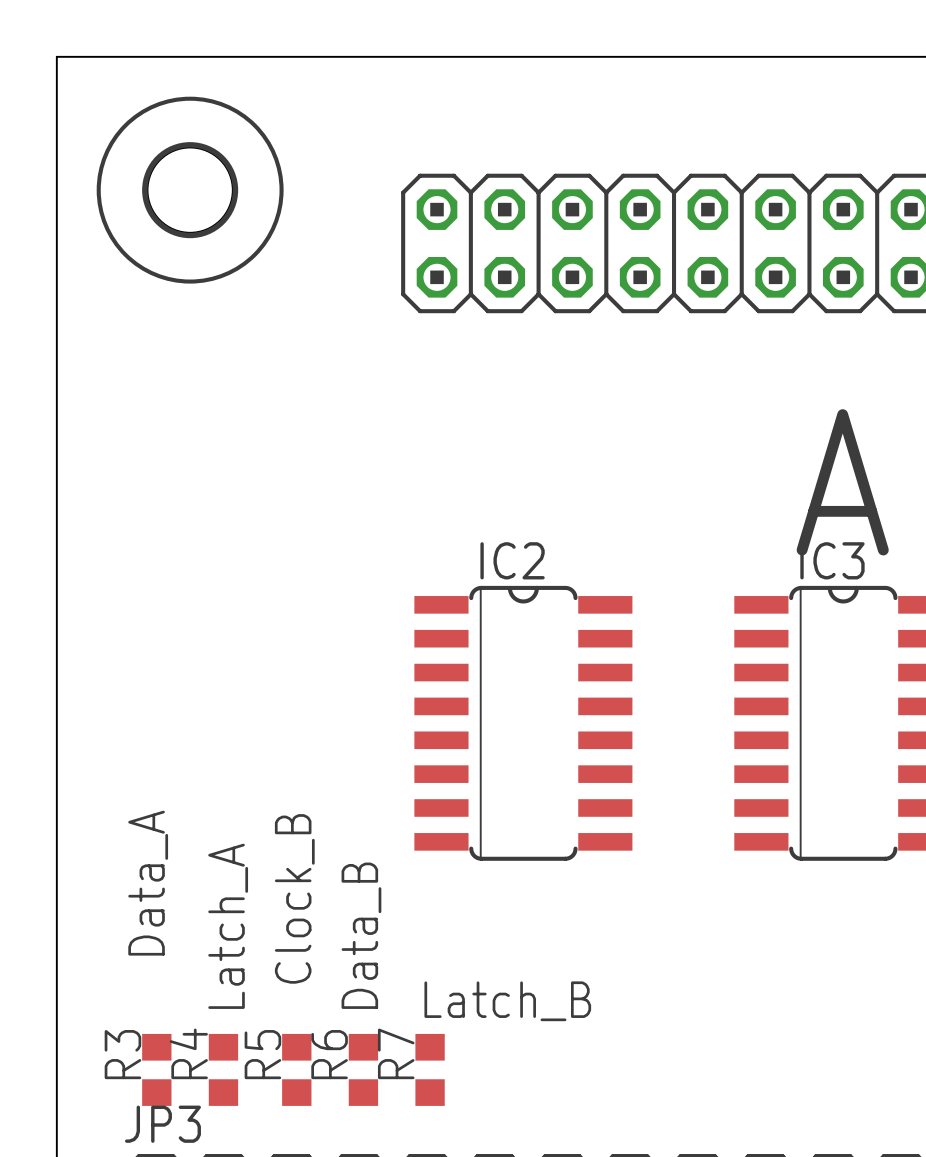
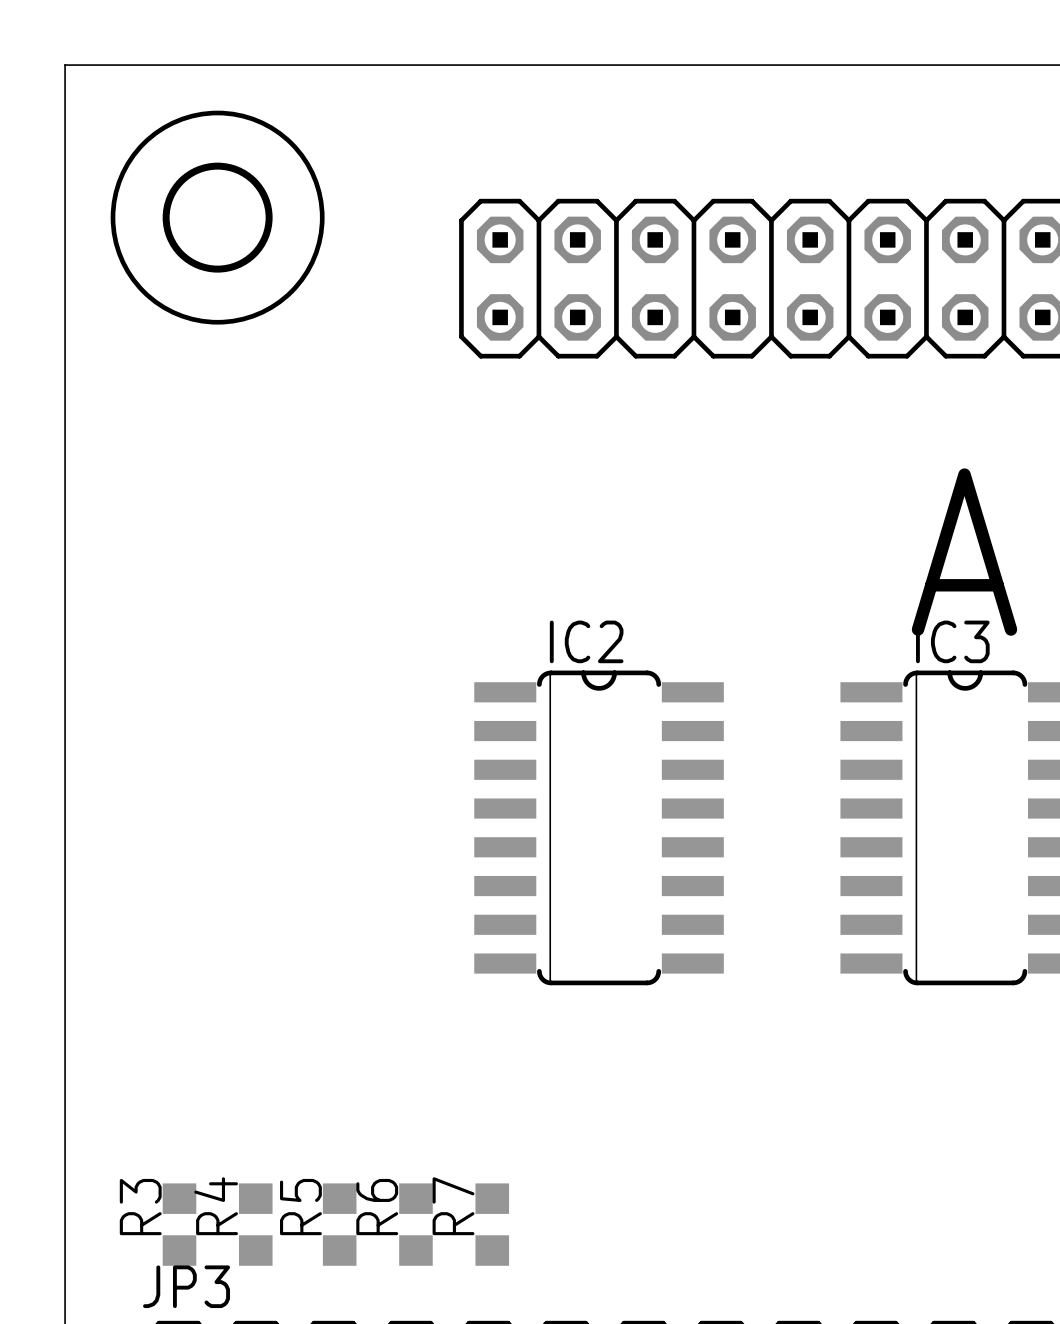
text: Data_A (148, 883) -> none
text: Clock_B (294, 898) -> none
text: Latch_A (228, 926) -> none
text: Data_B (361, 935) -> none
text: Latch_B (507, 1001) -> none

